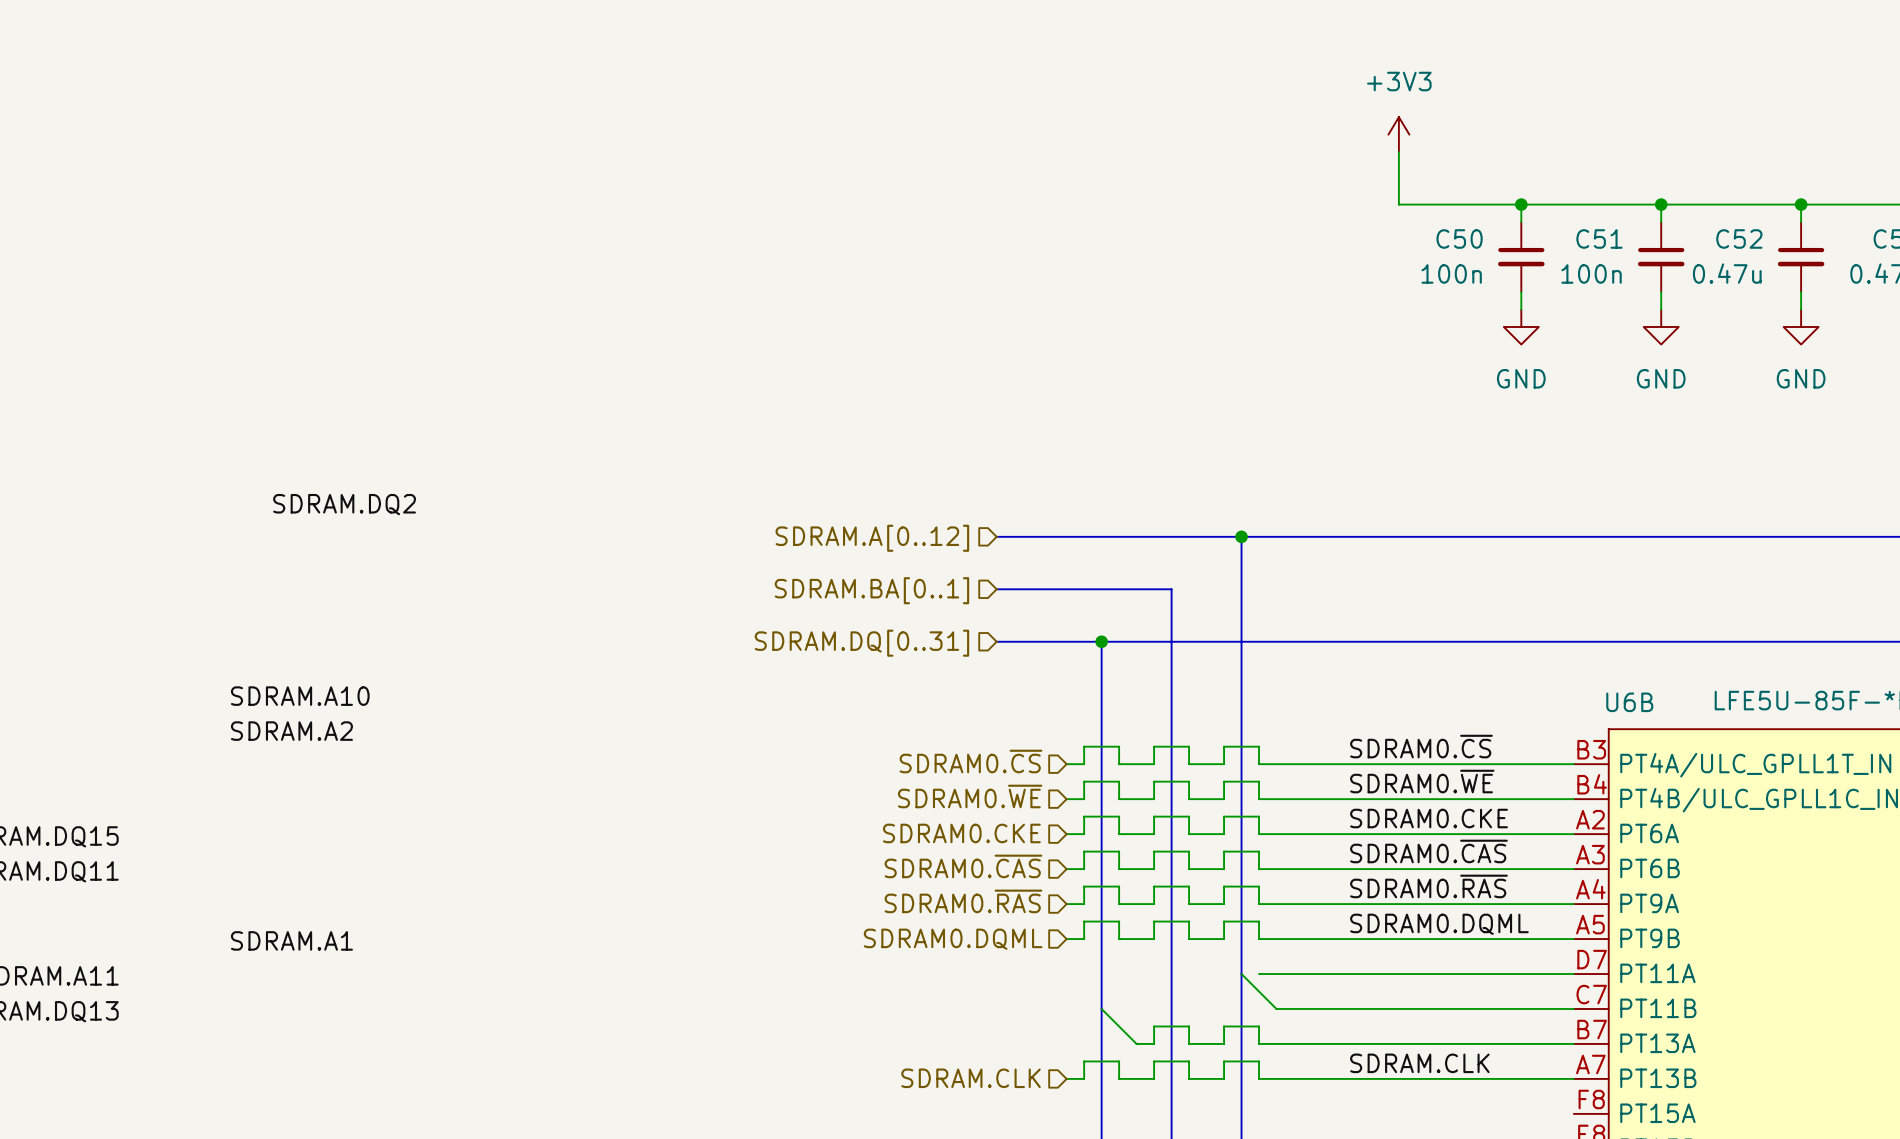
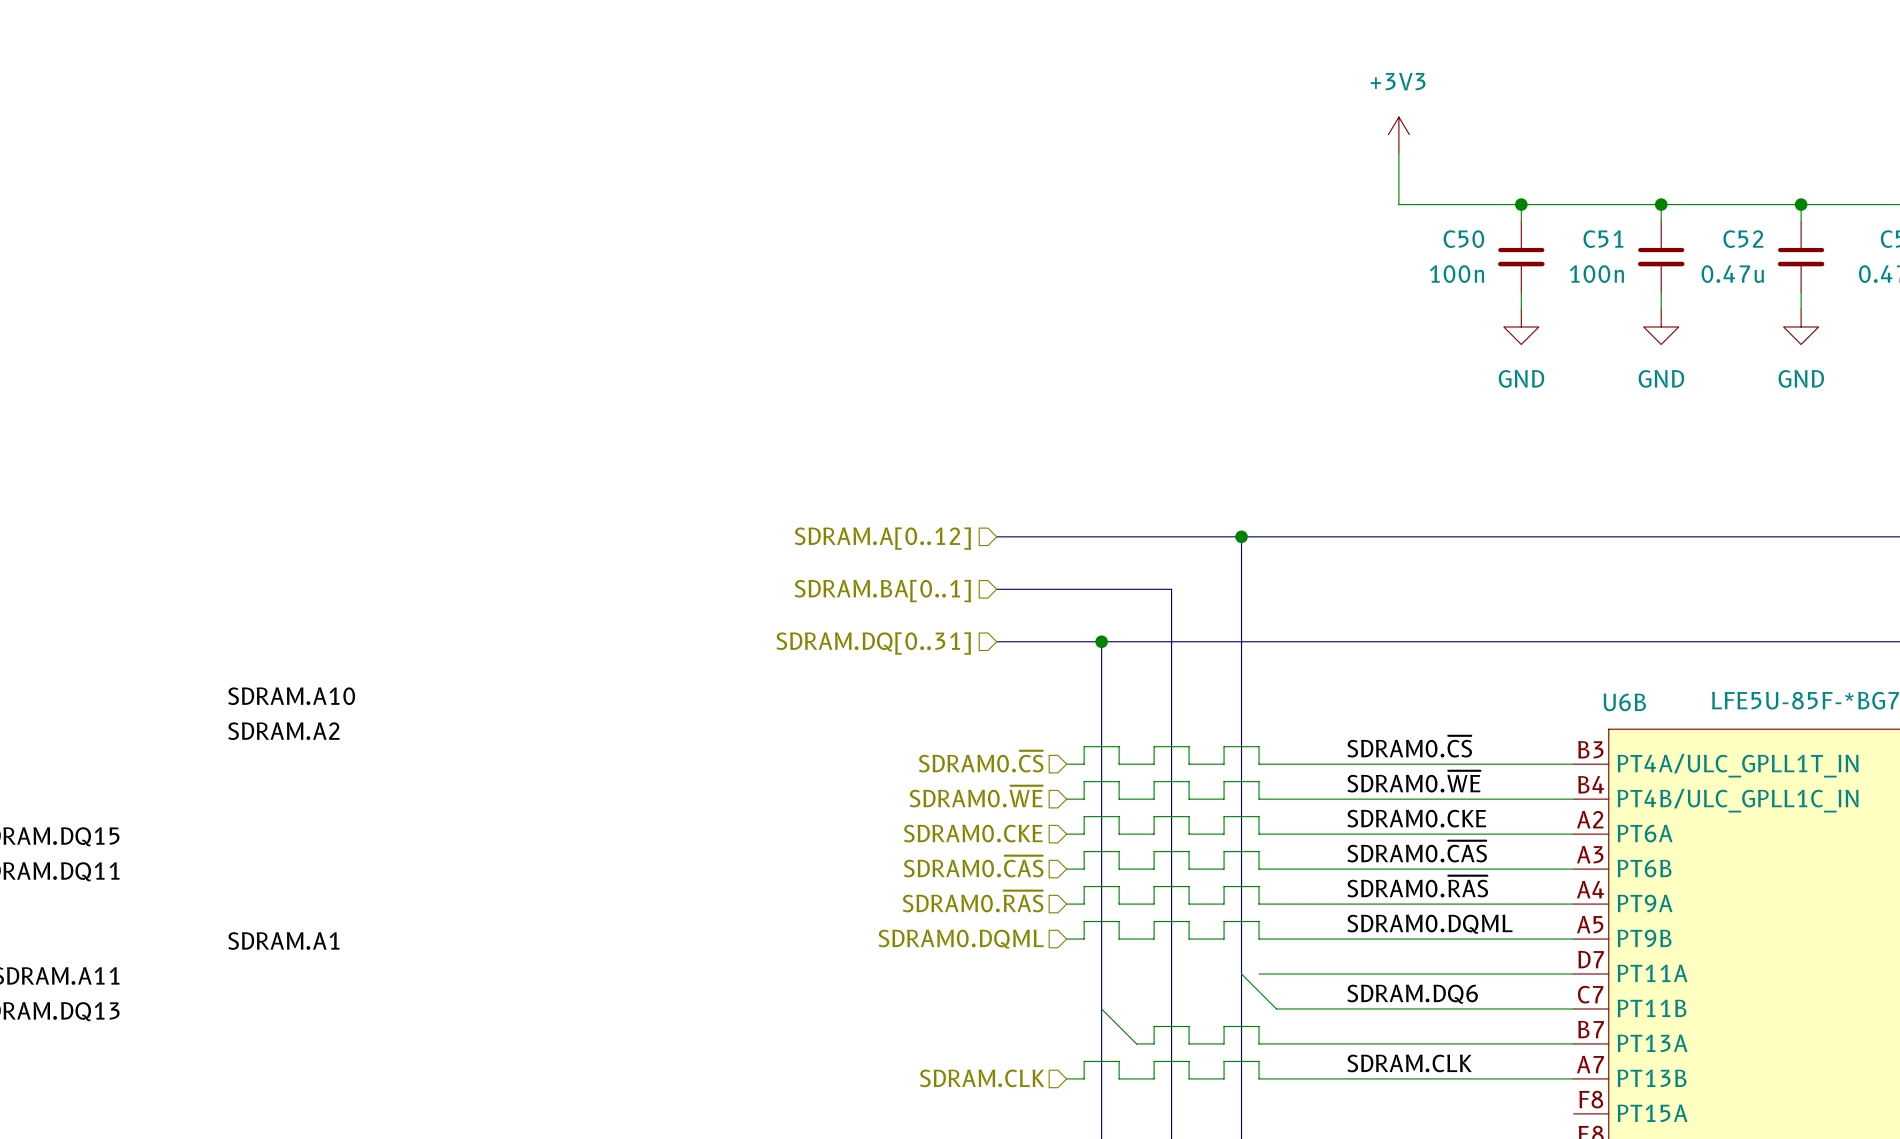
label: SDRAM.DQ2 (344, 504) -> none
label: none -> SDRAM.DQ6 (1412, 994)

